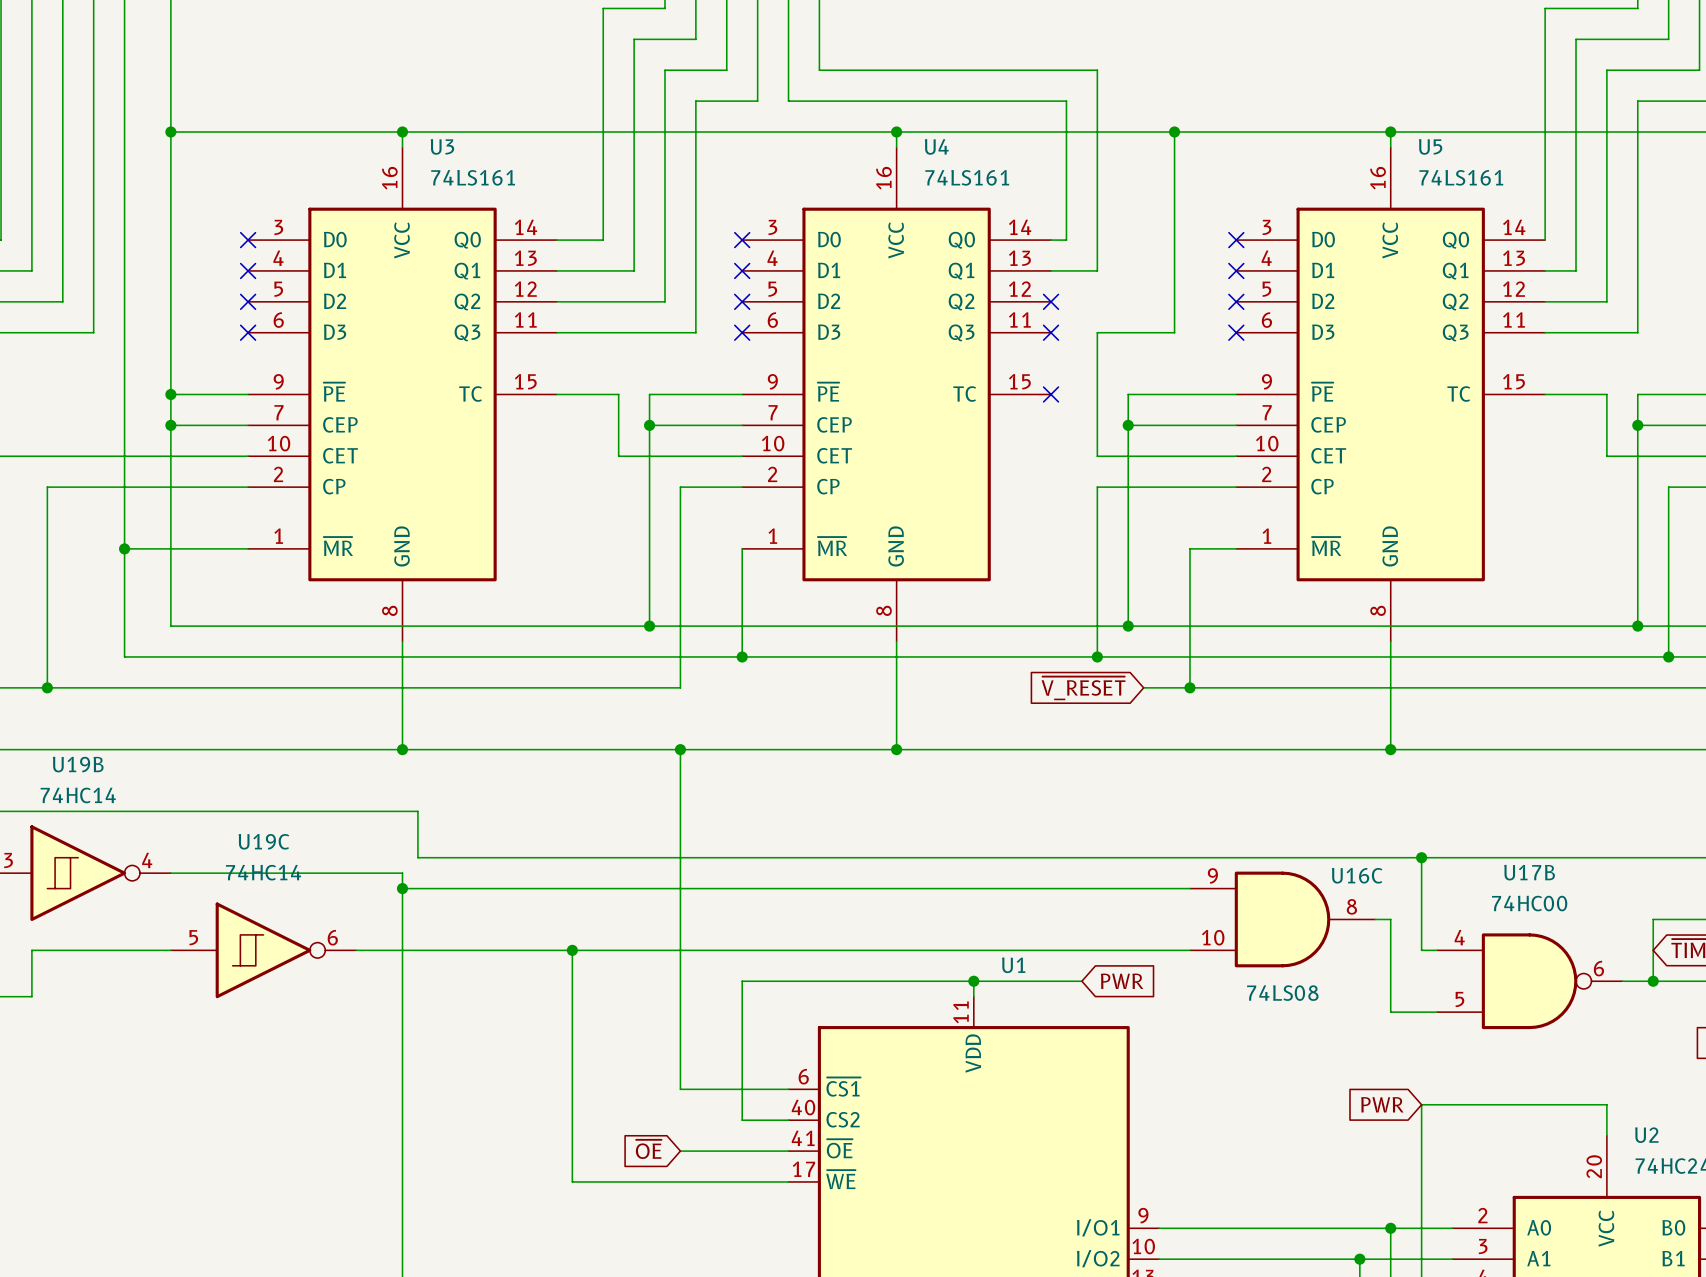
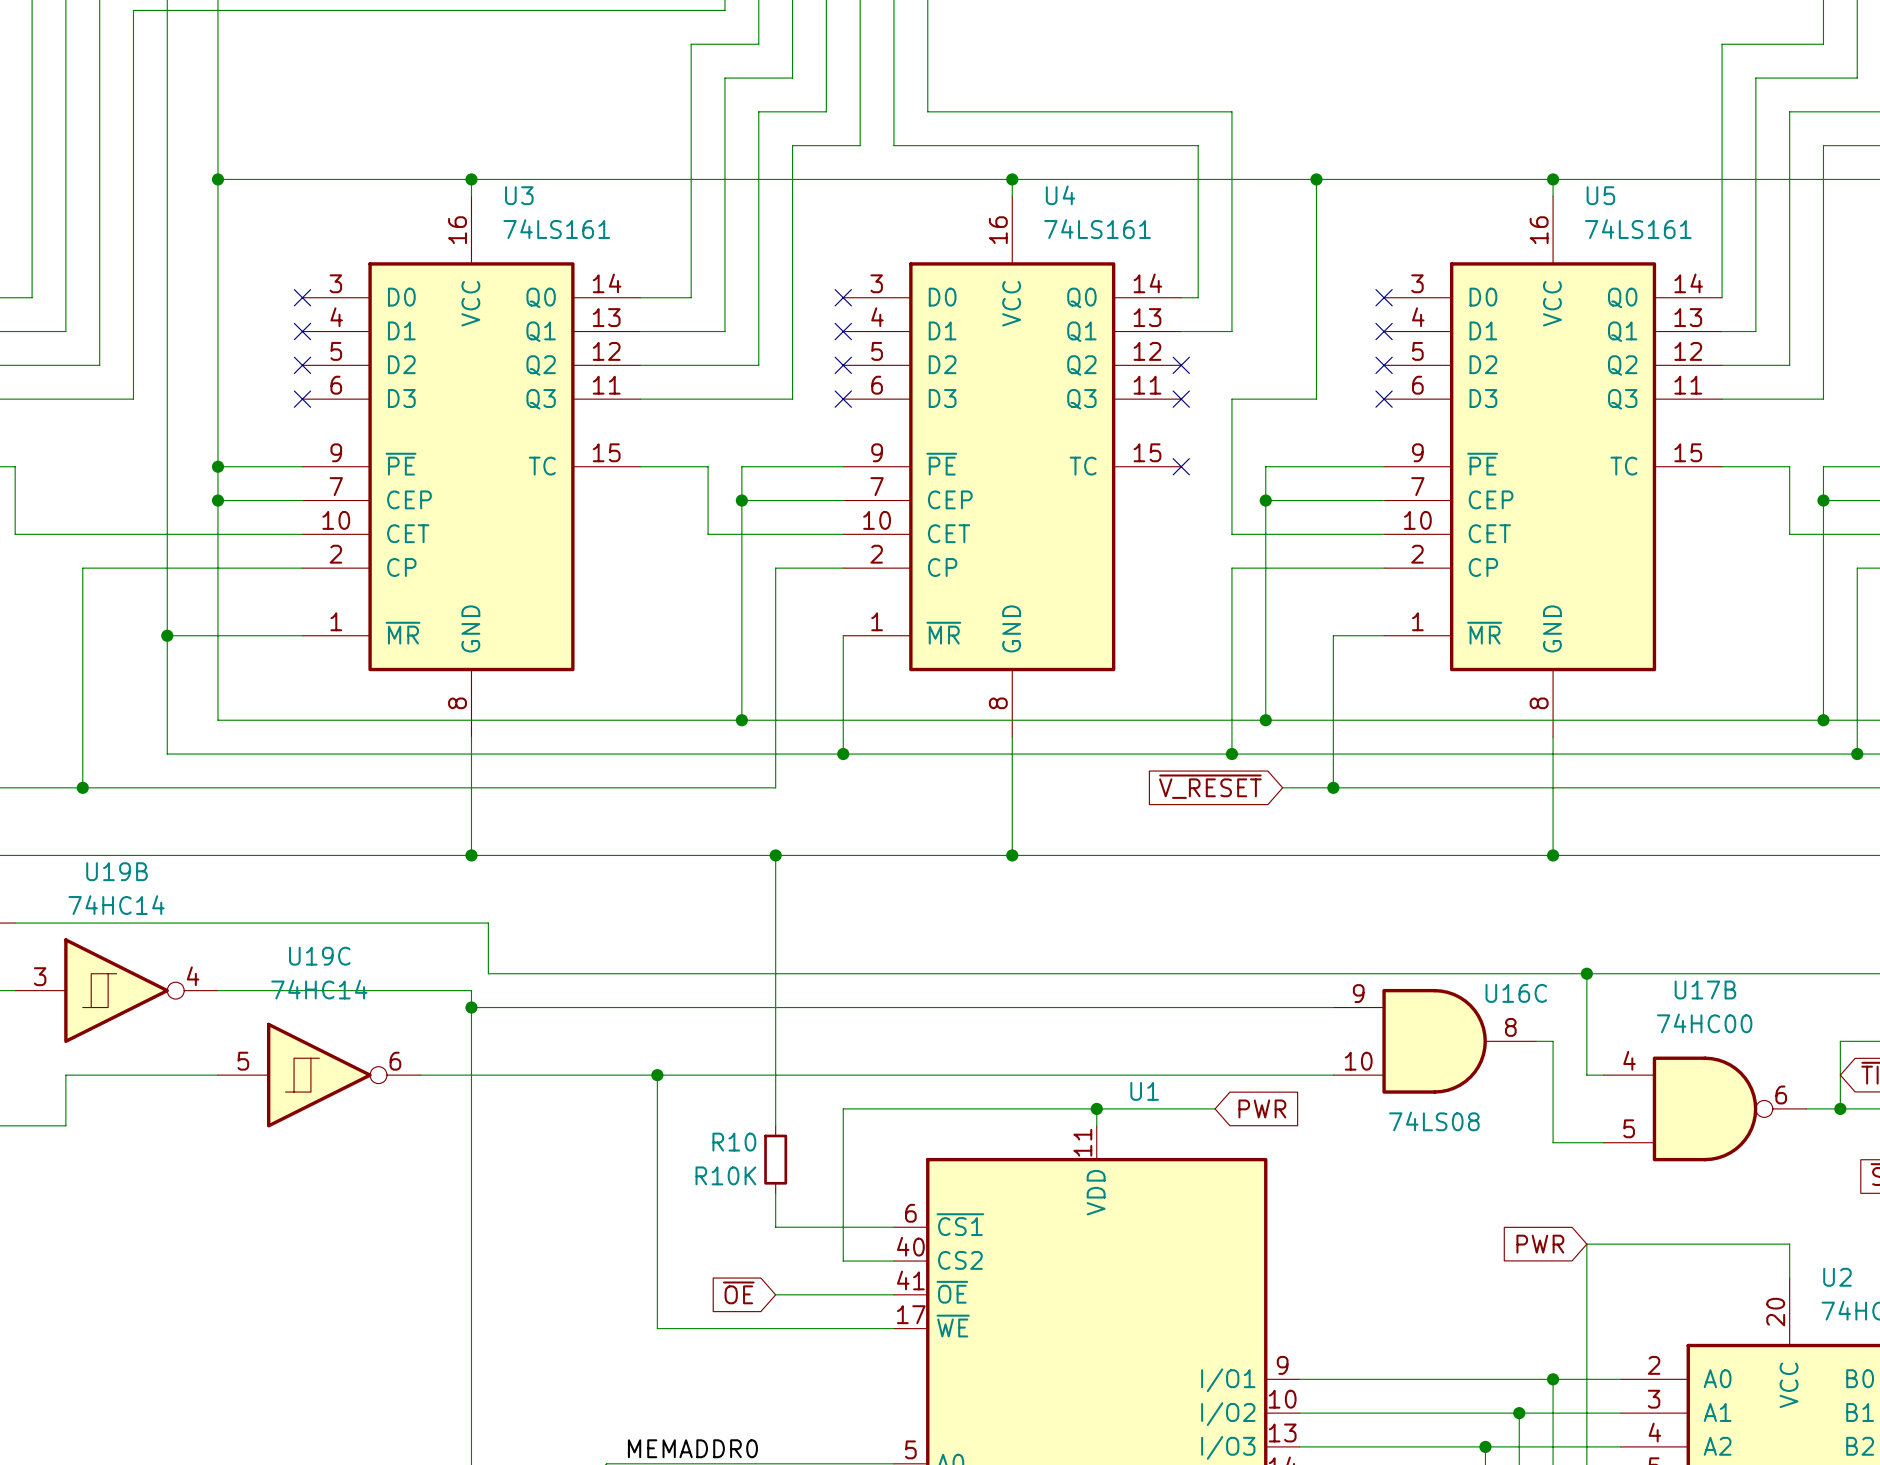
wire: (680, 996) (680, 1058) -> none
R10: none -> R10K (775, 1159)

